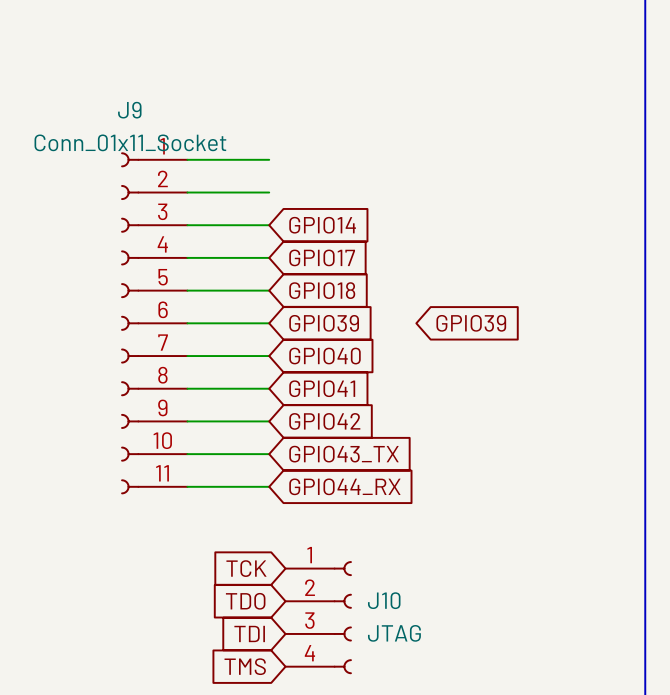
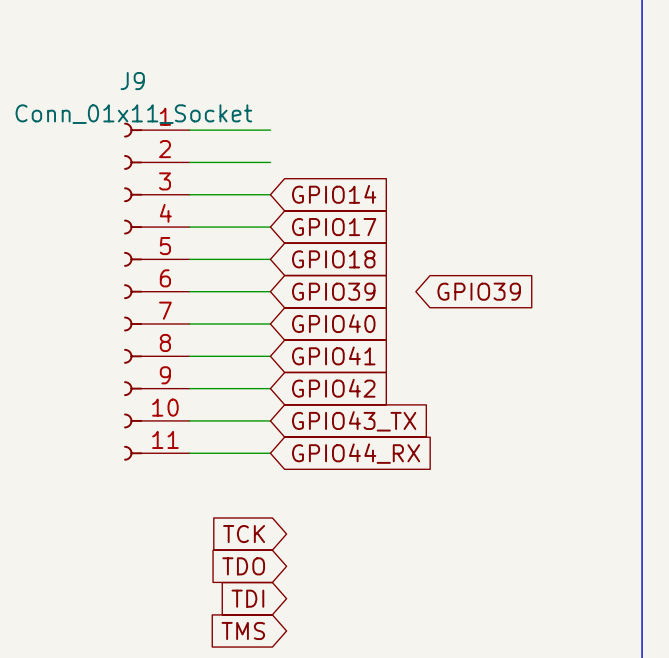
J10: JTAG (318, 617) -> none

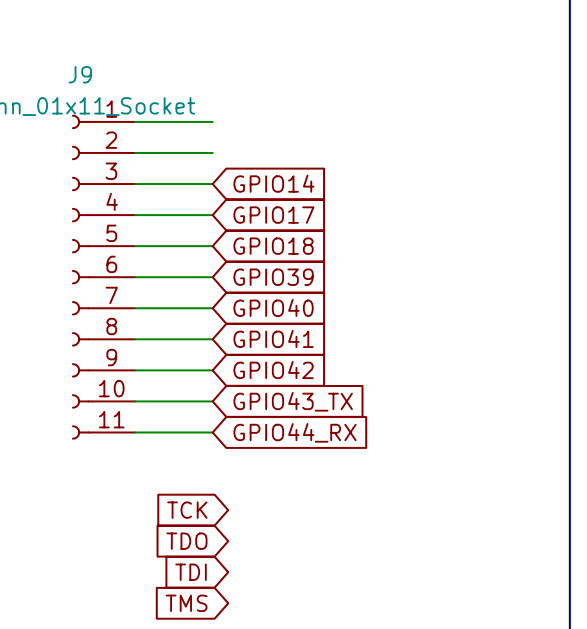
global label: GPIO39 (479, 291) -> none

